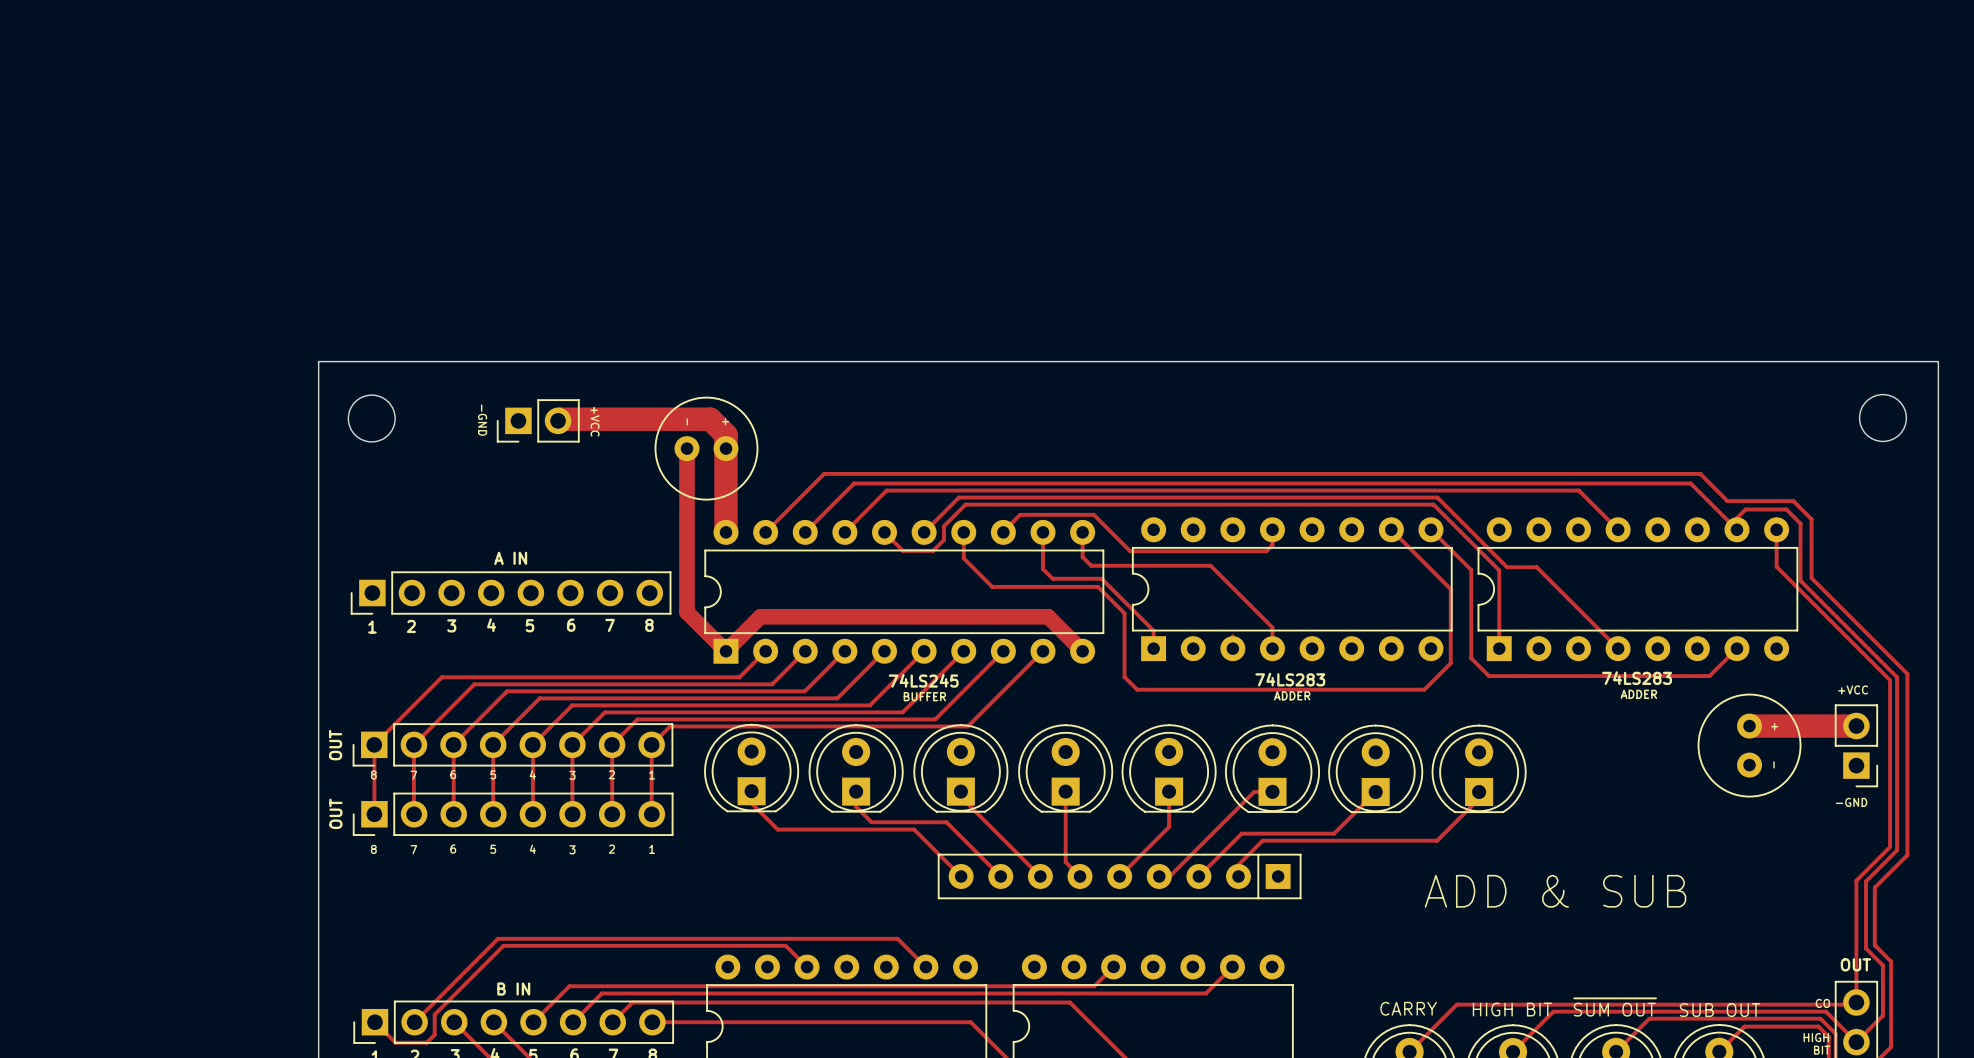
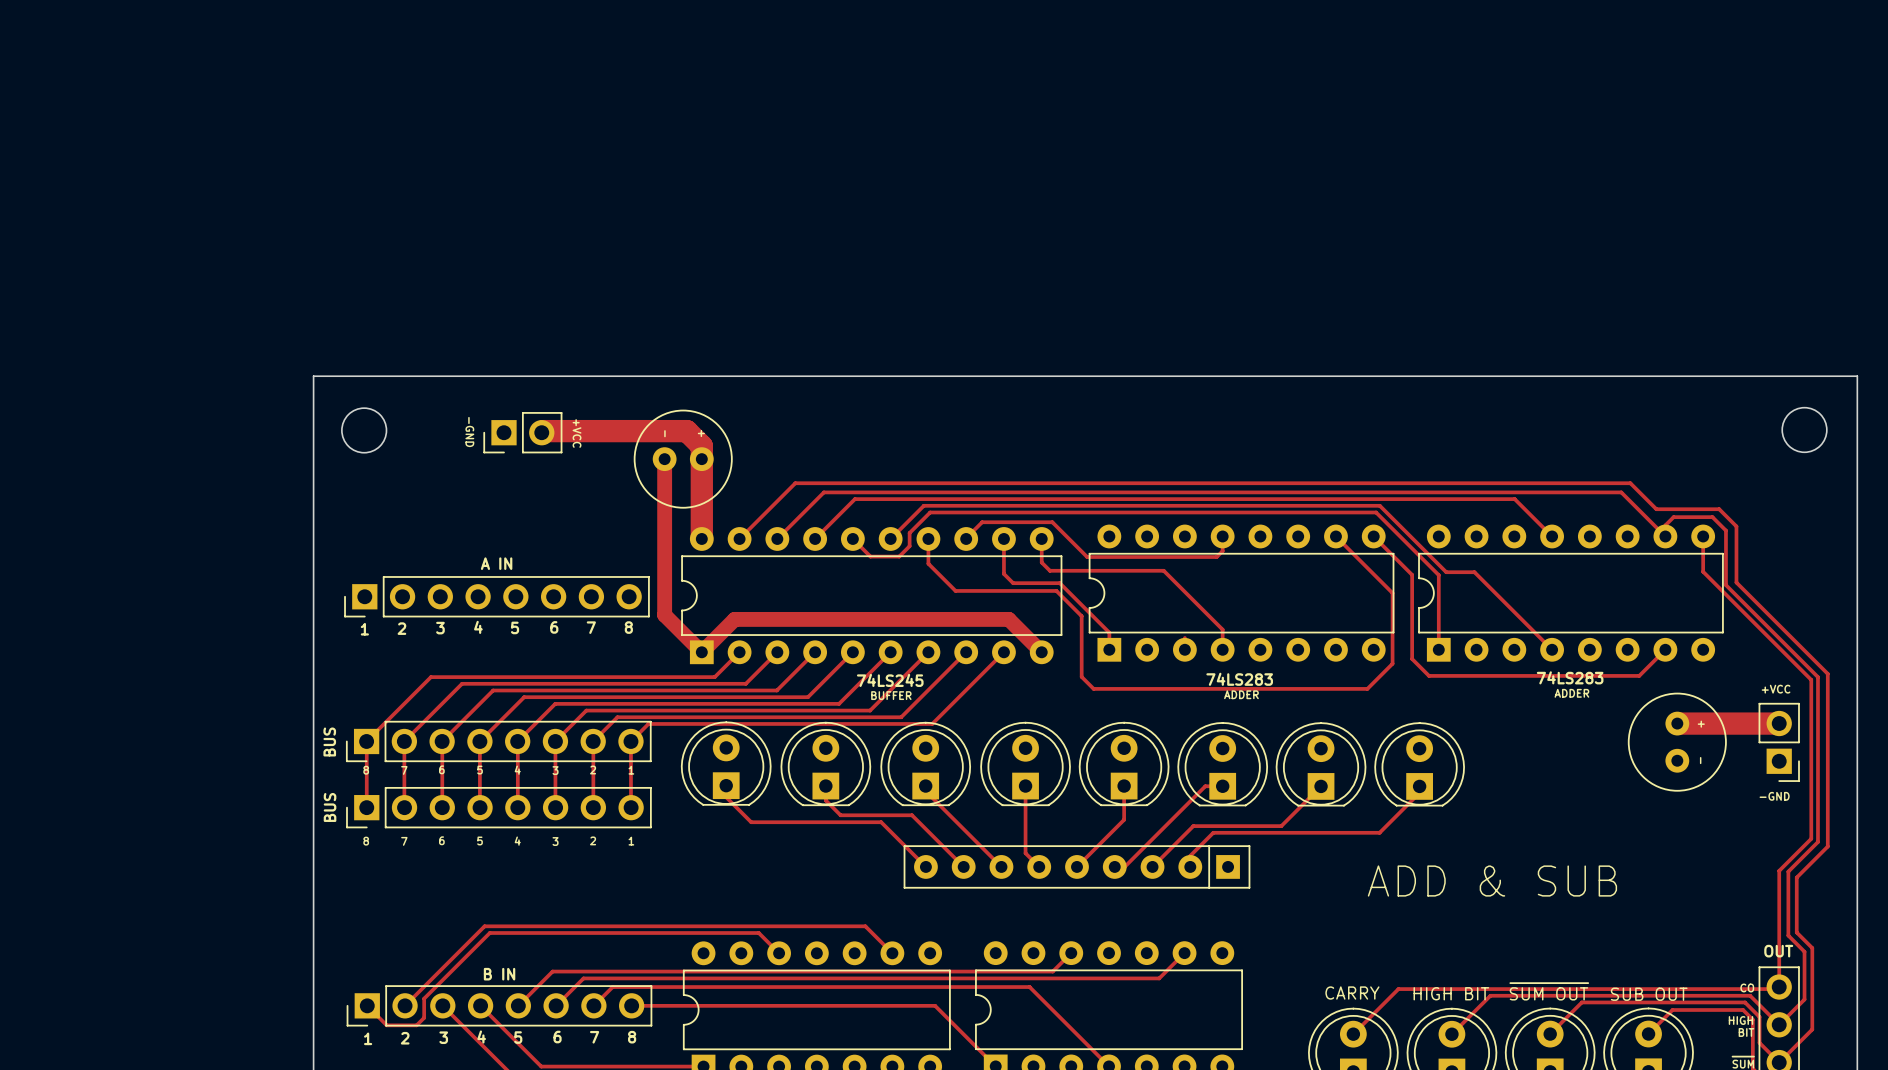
text: OUT (335, 745) -> BUS (329, 741)
text: OUT (335, 813) -> BUS (330, 807)

